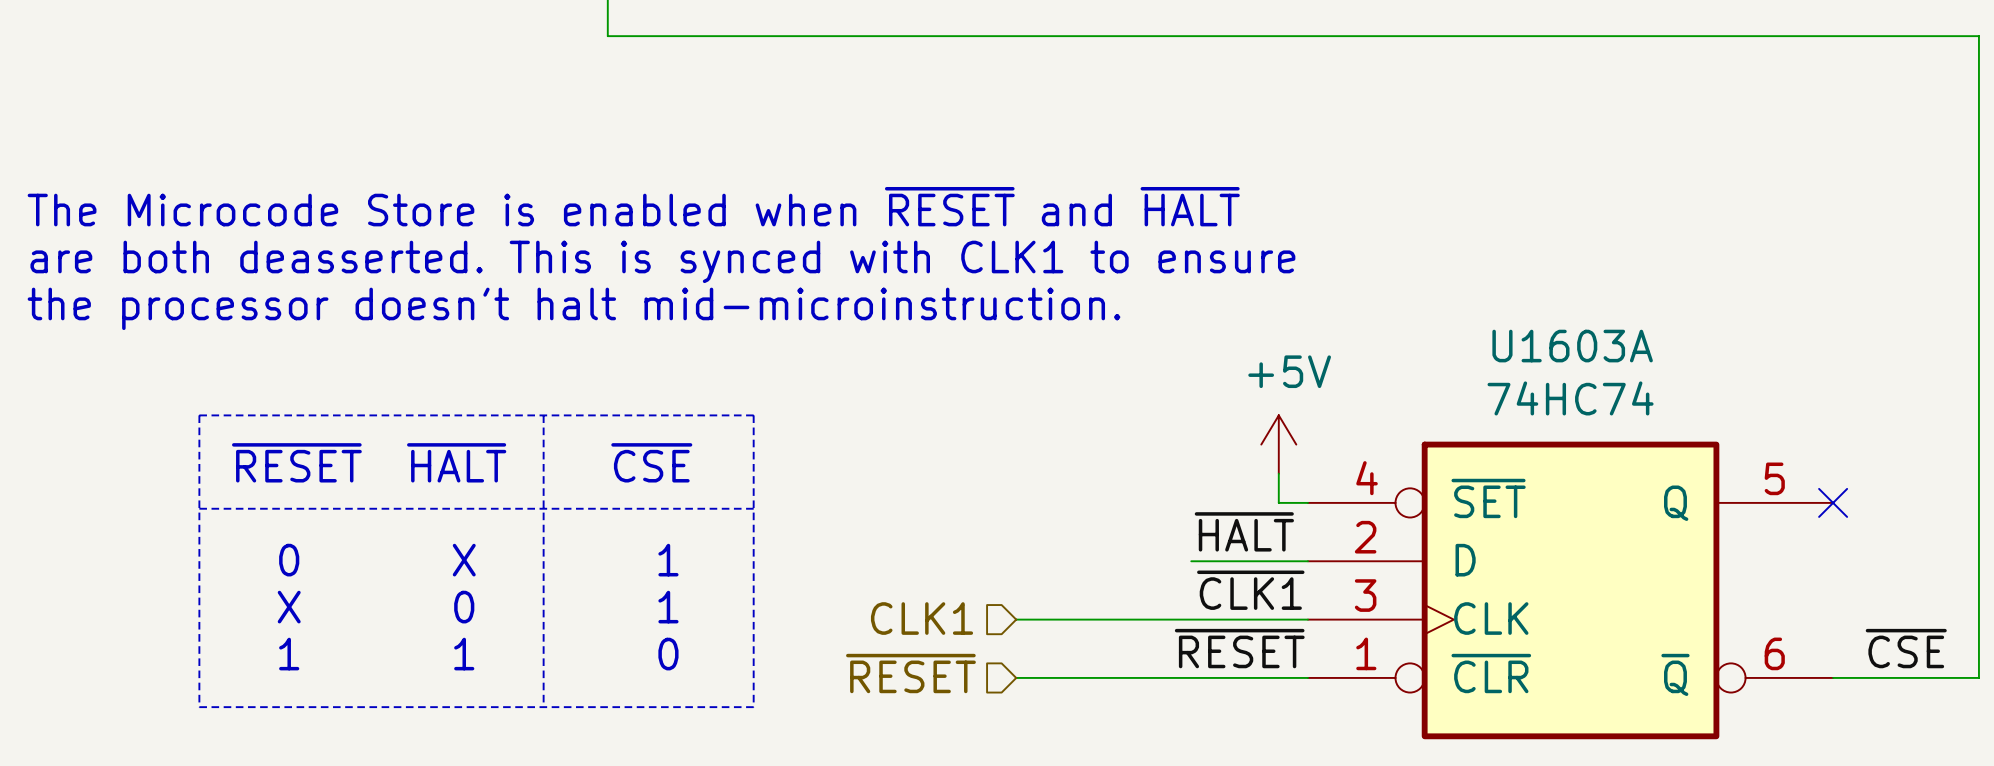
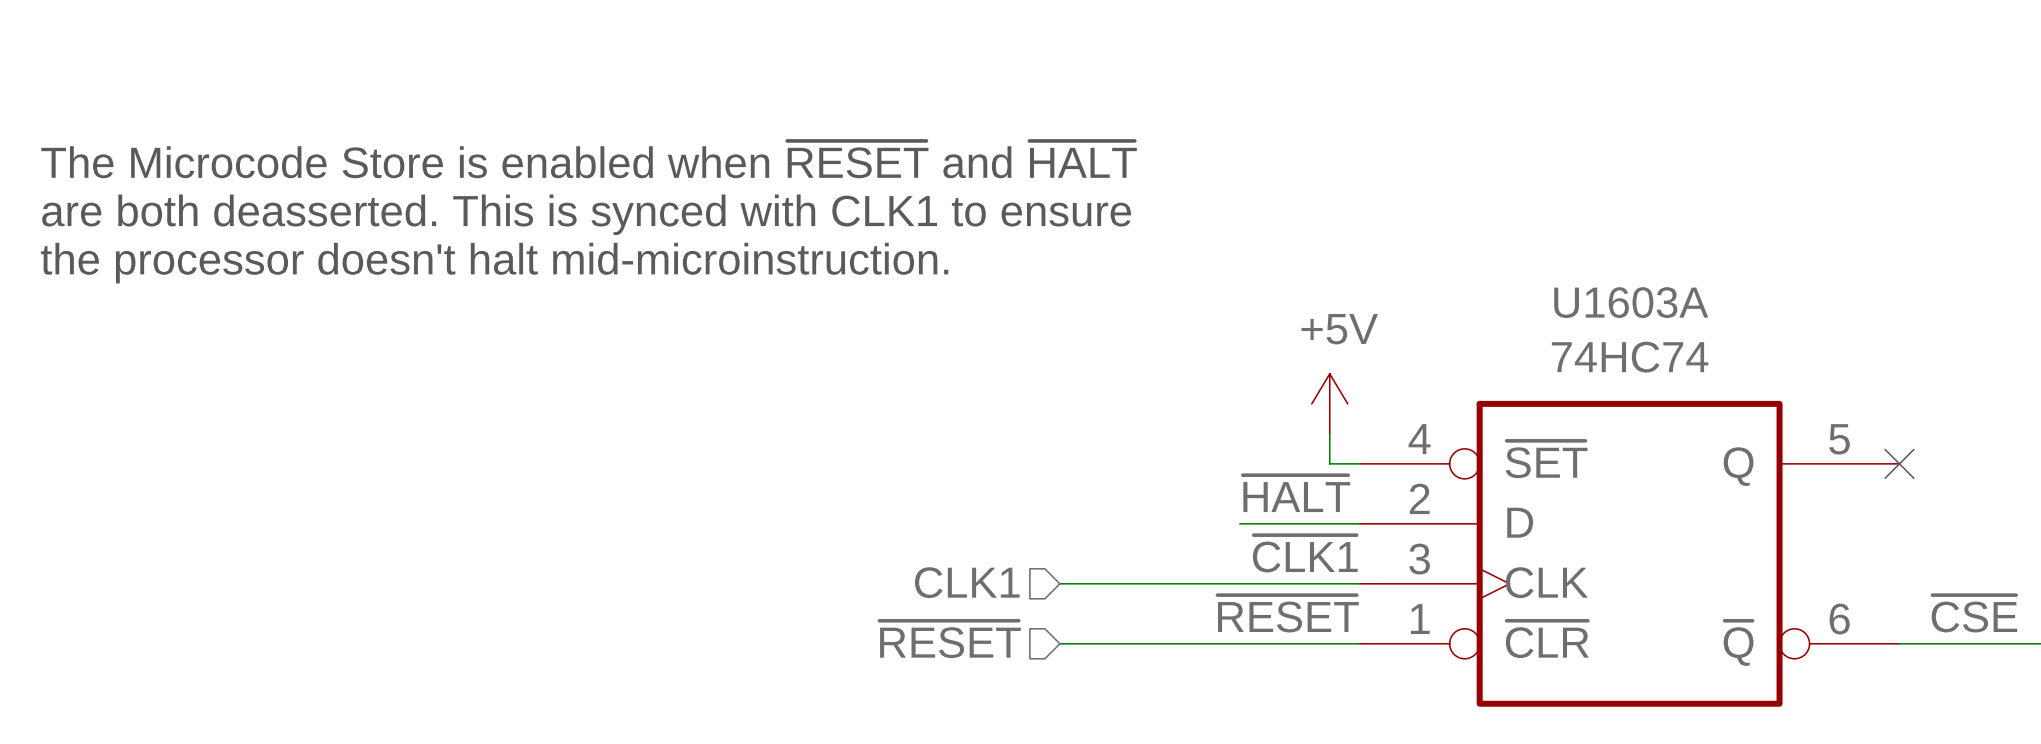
line: (199, 415) (753, 415) (753, 707) (199, 707) (199, 415) -> none
line: (543, 415) (543, 707) -> none
text: ~{RESET} (296, 462) -> none
text: ~{HALT} (456, 462) -> none
text: ~{CSE} (651, 462) -> none
line: (199, 508) (753, 508) -> none
text: 0 (289, 560) -> none
text: X (464, 560) -> none
text: 1 (668, 560) -> none
text: X (289, 607) -> none
text: 0 (464, 607) -> none
text: 1 (668, 607) -> none
text: 1 (289, 654) -> none
text: 1 (464, 654) -> none
text: 0 (668, 654) -> none

